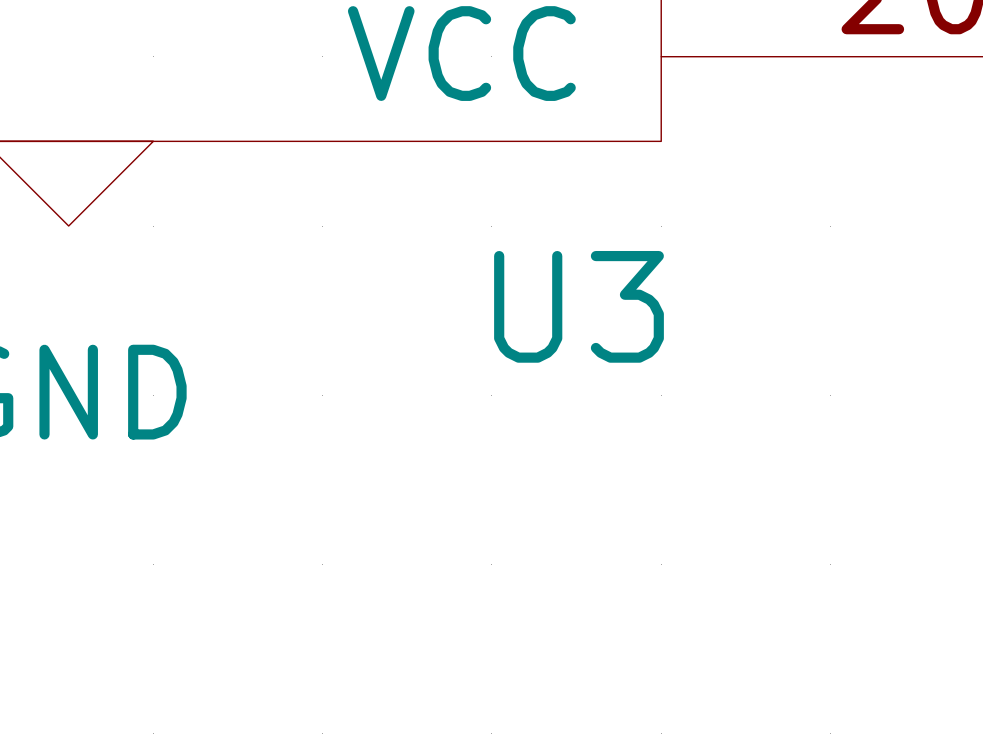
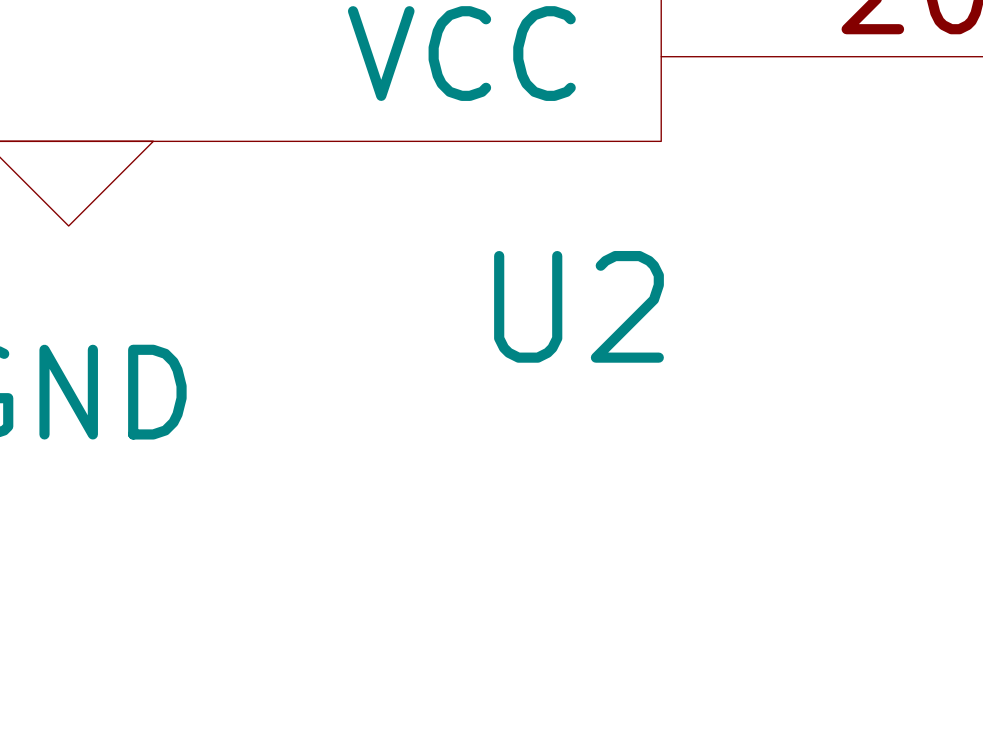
U3 name: U3 (579, 306) -> U2 (579, 306)

